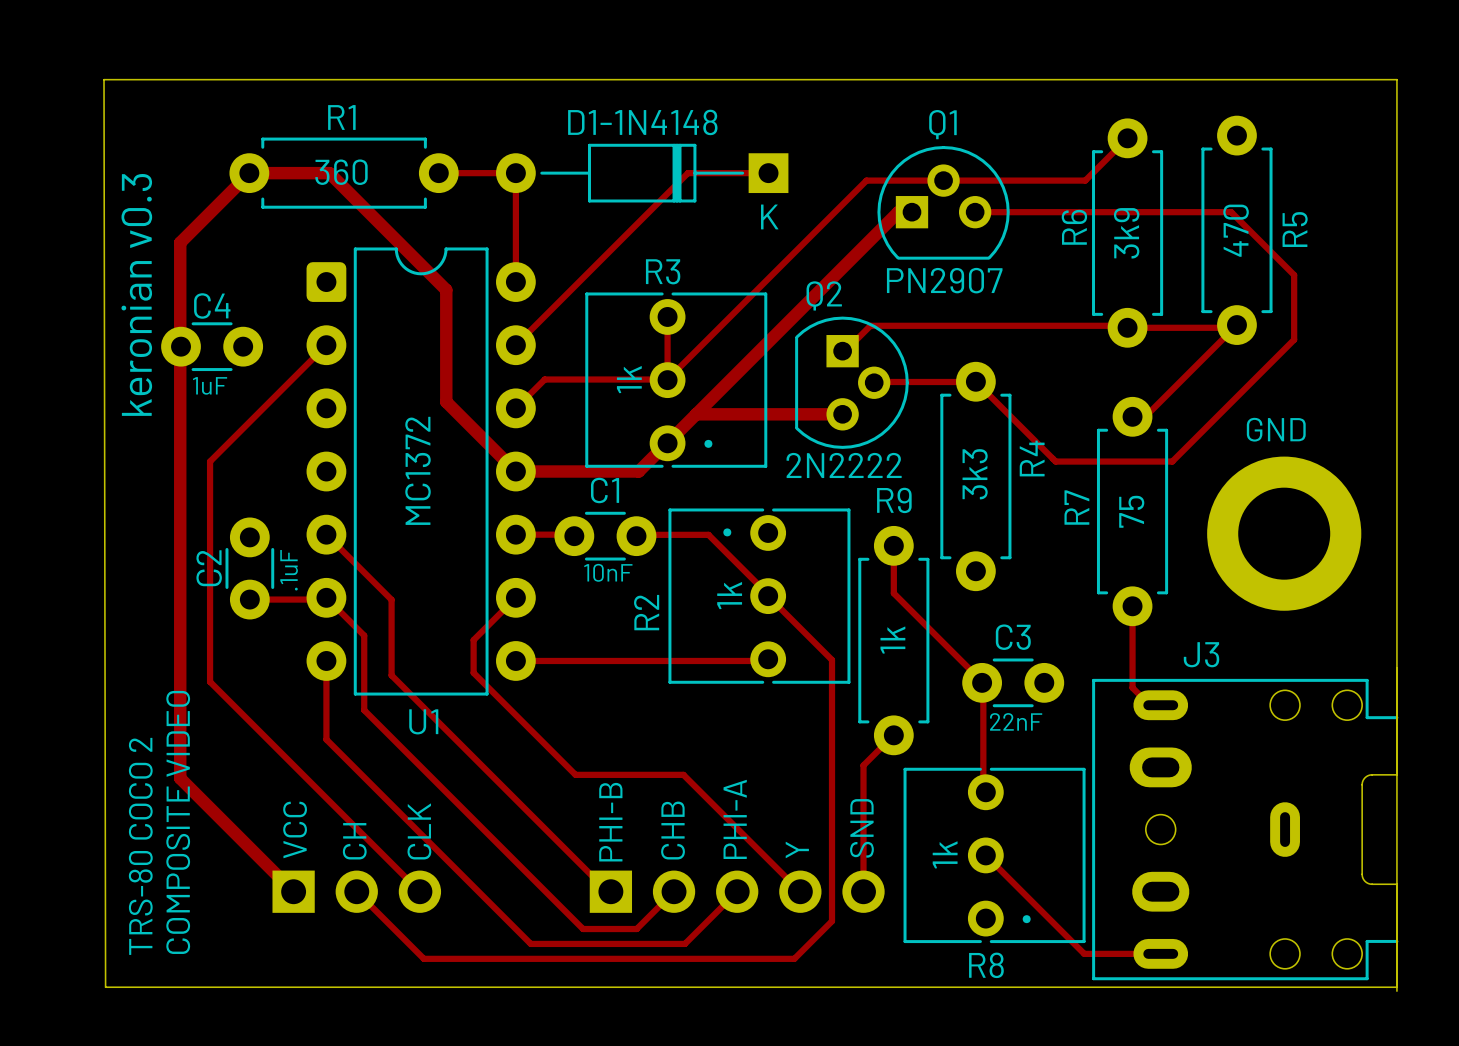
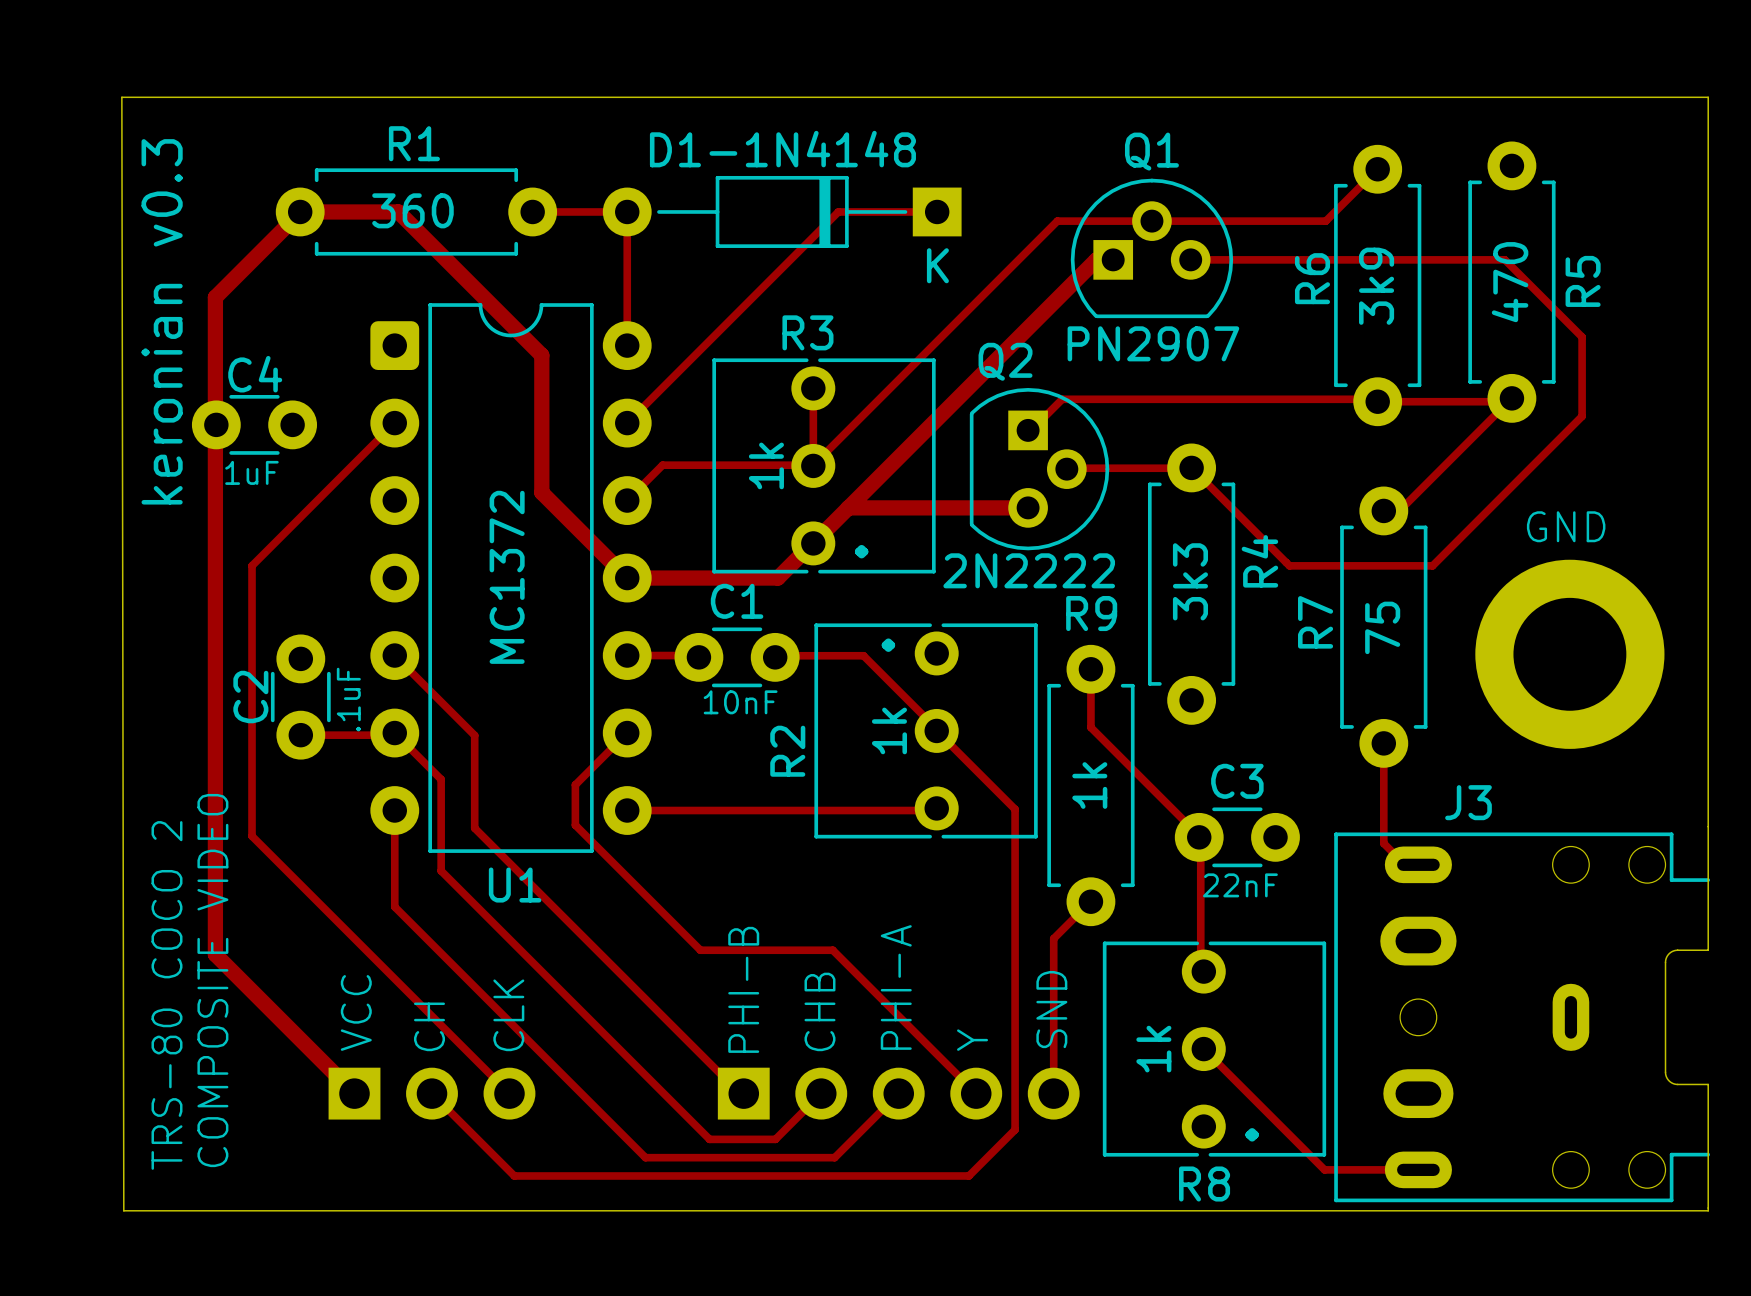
J3 footprint: [1092, 667, 1399, 992] -> [1334, 825, 1711, 1209]
board edge: (1396, 674) (1396, 984) -> none

